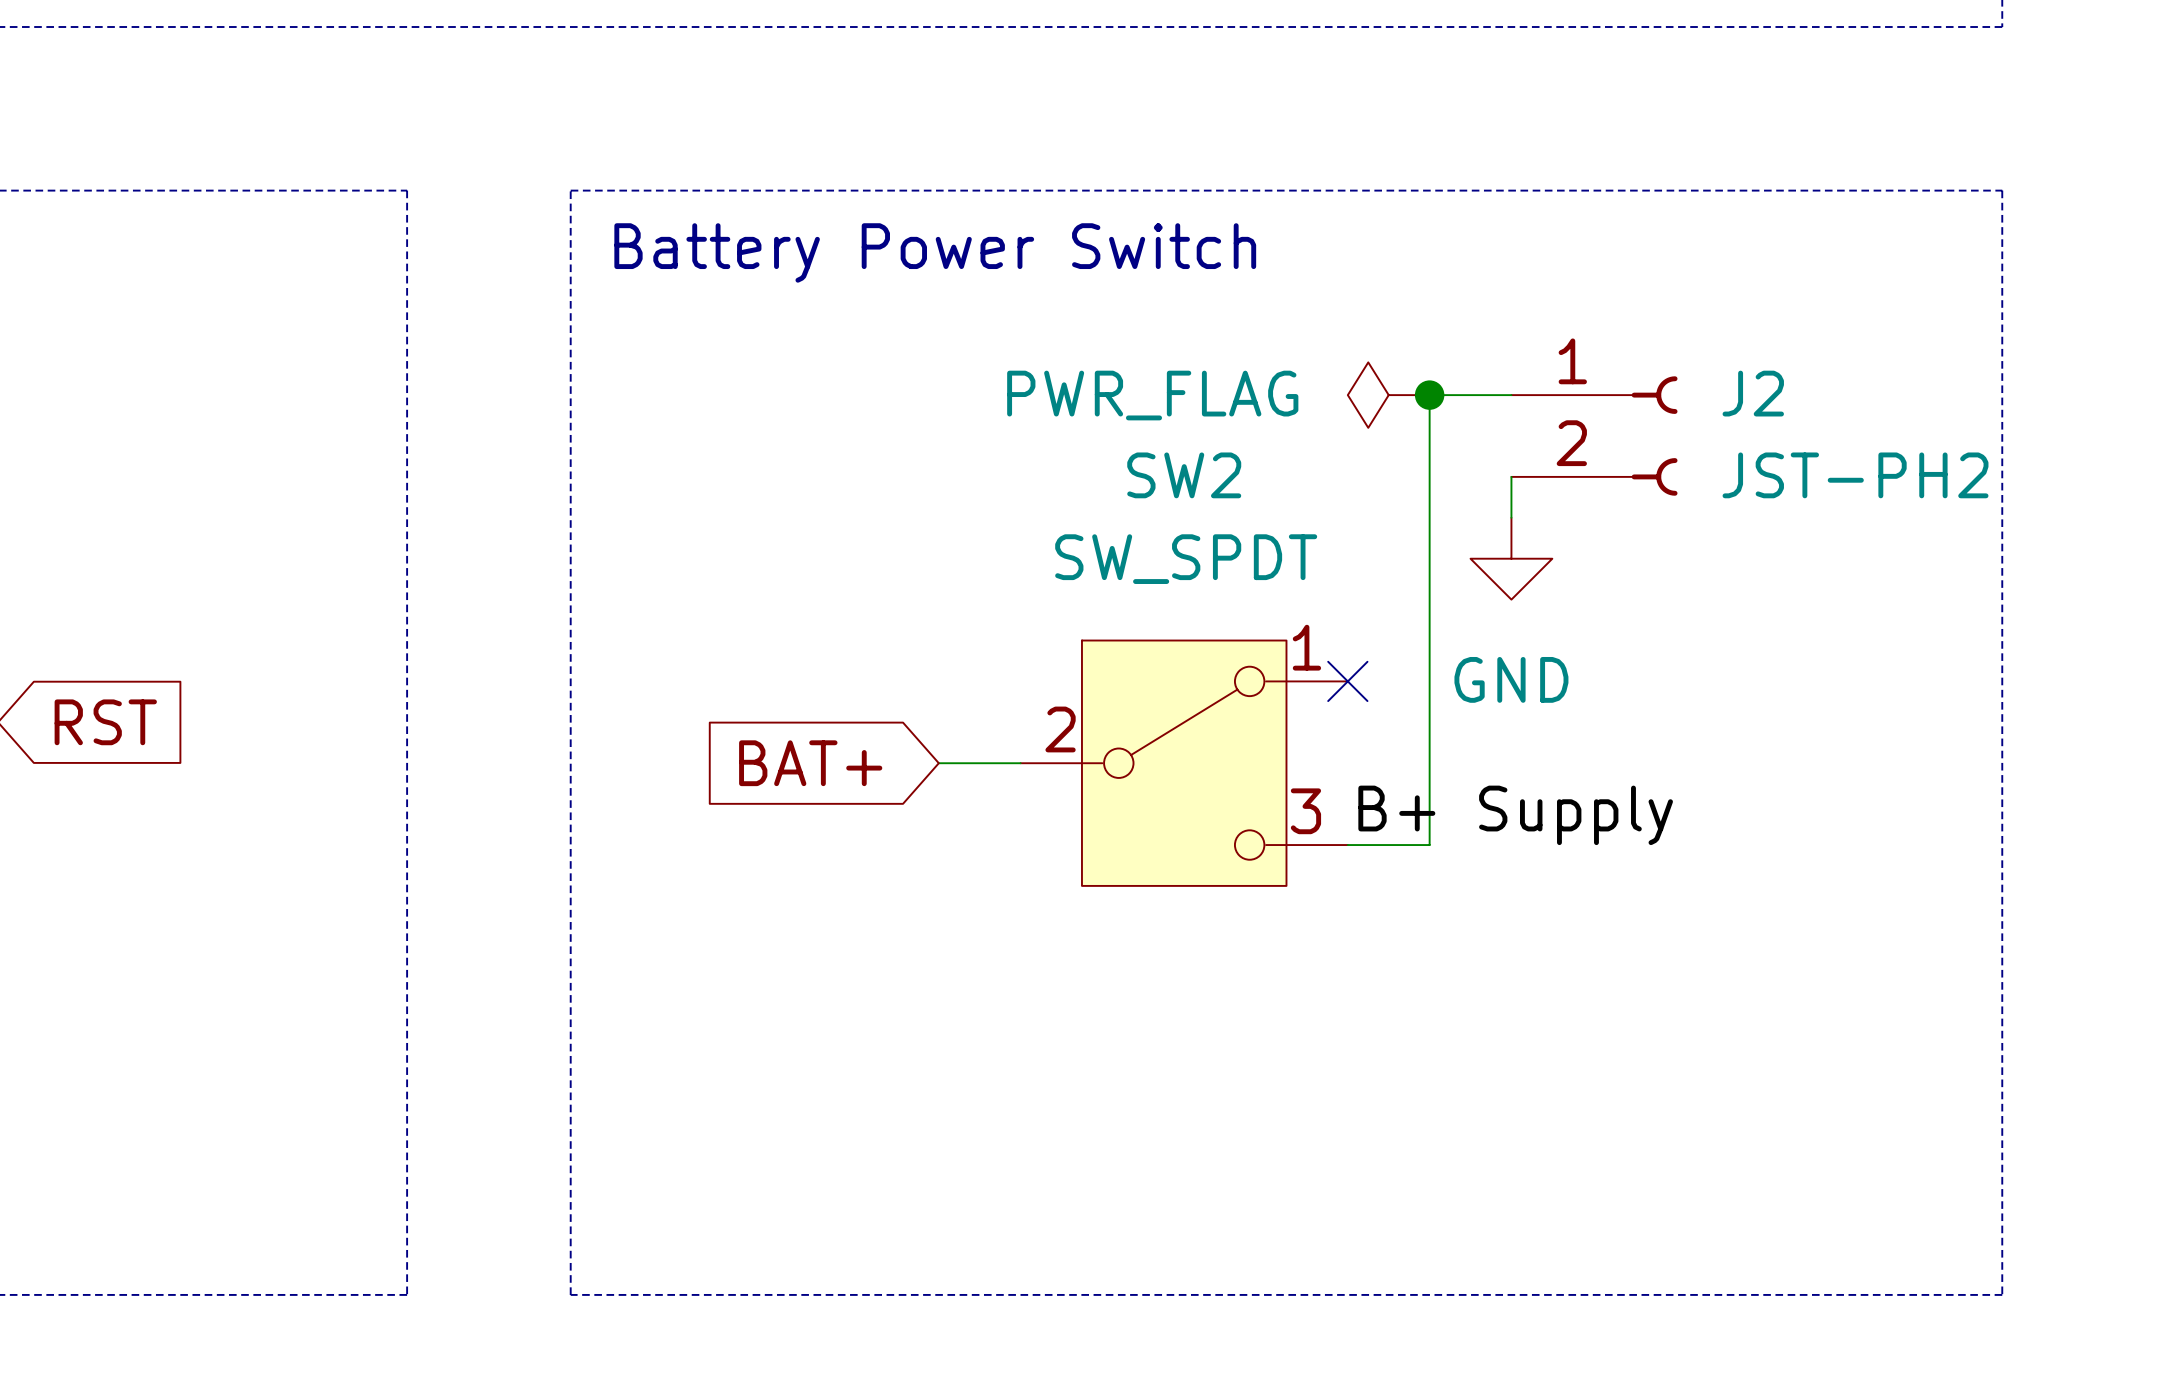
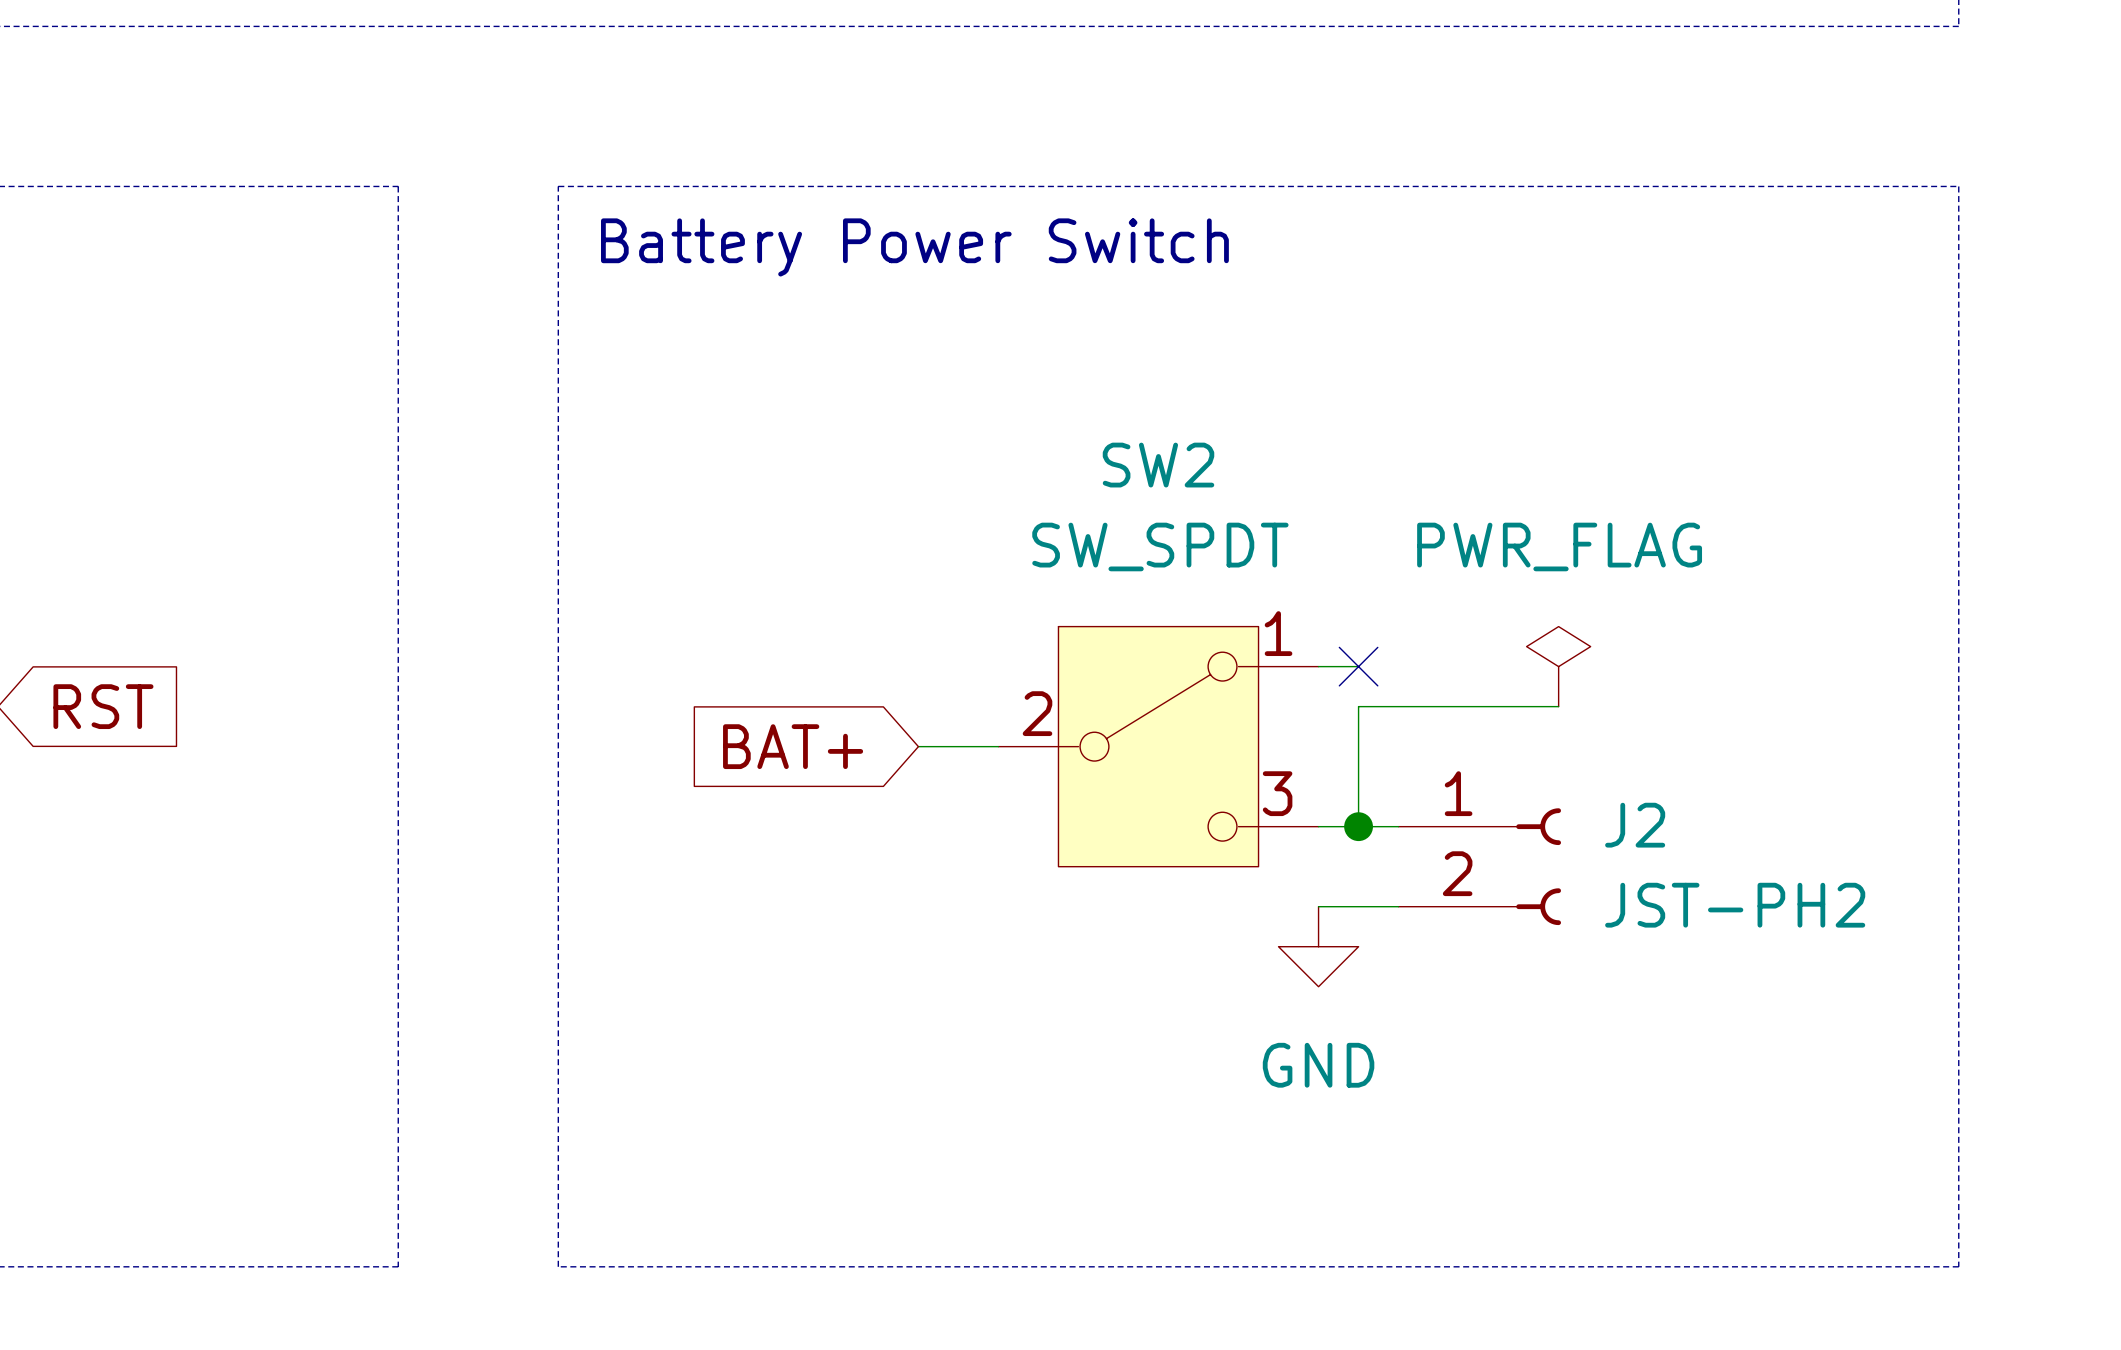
power symbol text position: PWR_FLAG (1152, 395) -> PWR_FLAG (1559, 546)
power symbol rotation: 0° (1388, 395) -> 90° clockwise (1558, 666)
power symbol position: PWR_FLAG (1388, 395) -> PWR_FLAG (1558, 666)
junction: (1429, 395) -> none
wire: (1511, 395) (1429, 395) (1429, 845) -> none
J2 position: (1594, 436) -> (1479, 866)
wire: (1511, 476) (1511, 517) -> none
power symbol position: GND (1511, 558) -> GND (1318, 946)
wire: none -> (1318, 666) (1358, 666)
no-connect mark position: (1347, 681) -> (1358, 666)
wire: none -> (1558, 706) (1358, 706) (1358, 826)
label: B+ Supply (1515, 815) -> none
junction: none -> (1358, 826)
wire: none -> (1318, 906) (1398, 906)

